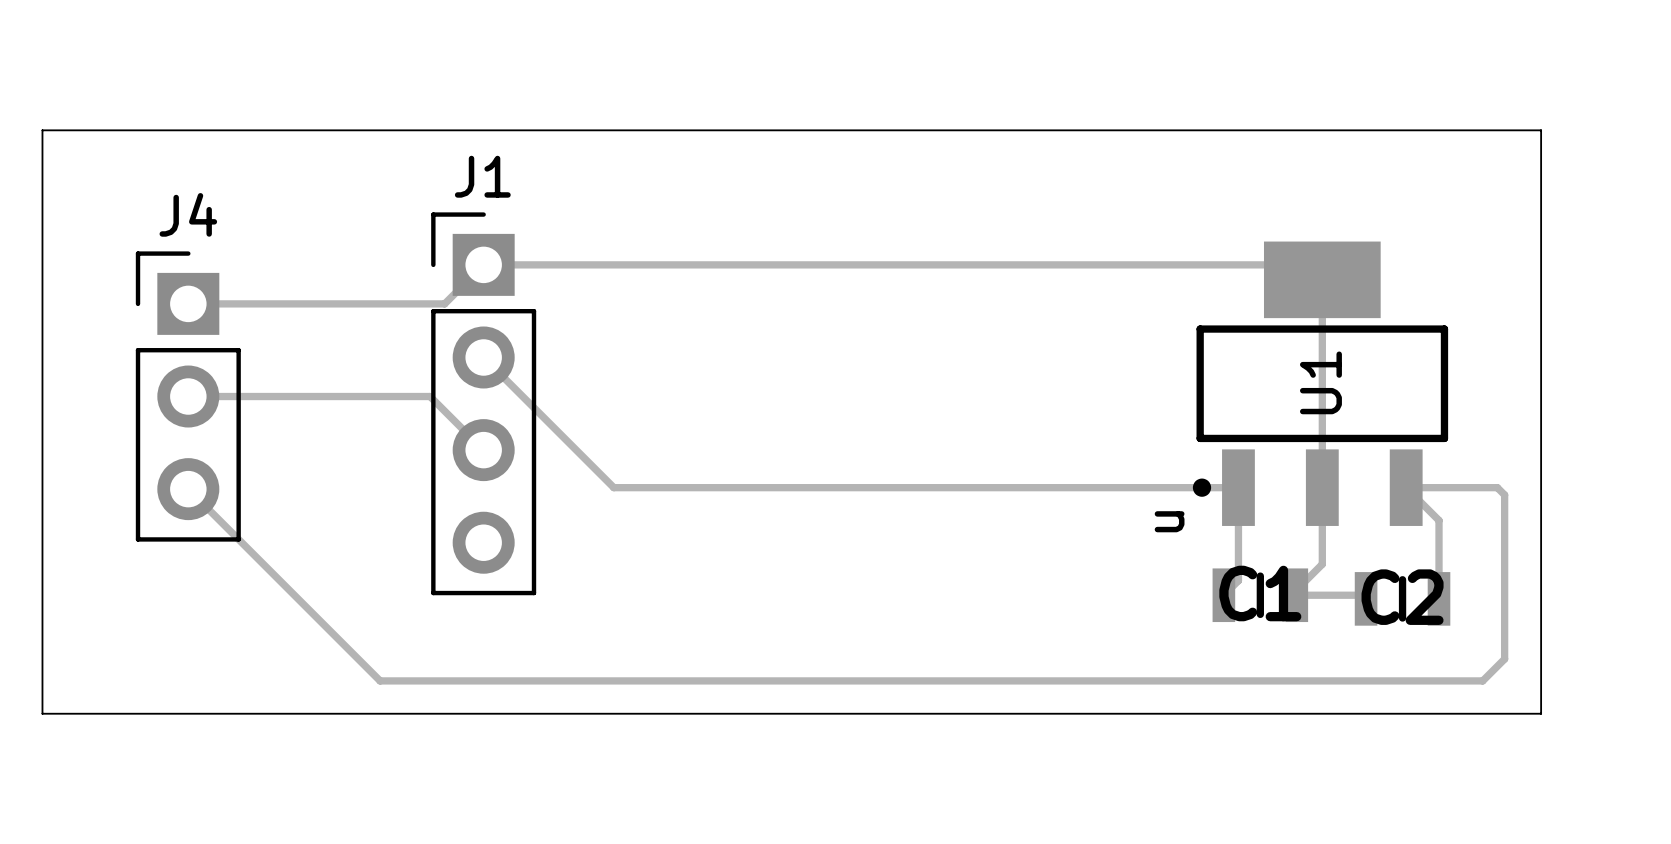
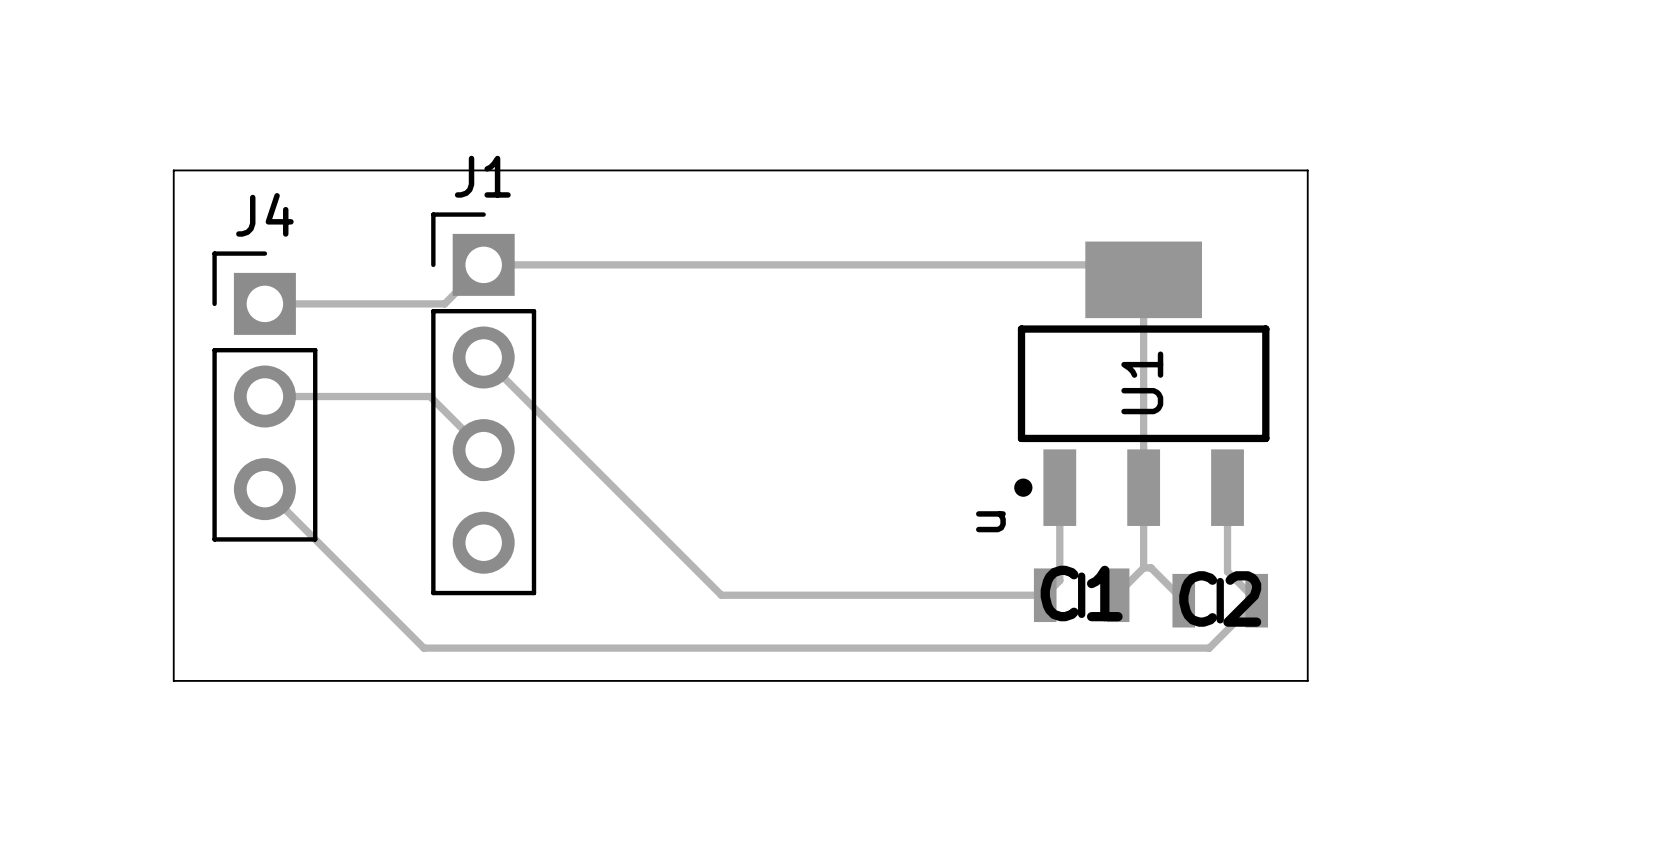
board edge: (42, 130) (1541, 130) (1541, 713) (42, 713) (42, 130) -> (173, 170) (173, 680) (1307, 680) (1307, 170) (173, 170)
track: (1128, 264) (1307, 264) (1322, 279) (1322, 564) (1296, 589) (1296, 595) (1362, 595) (1366, 598) -> (1128, 264) (1143, 279) (1143, 567)
track: (188, 303) (264, 303) -> none
U1 position: (1320, 383) -> (1141, 383)
track: (188, 396) (264, 396) -> none
J4 position: (188, 396) -> (264, 396)
track: (613, 487) (1238, 487) (1238, 580) (1223, 595) -> (613, 487) (721, 595) (1045, 595) (1059, 580) (1059, 487)
track: none -> (1227, 487) (1227, 571) (1256, 600) (1209, 648) (423, 648) (264, 489)
track: (188, 489) (380, 680) (1482, 680) (1504, 659) (1504, 494) (1497, 487) (1406, 487) (1439, 520) (1439, 598) -> none
track: none -> (1143, 567) (1118, 593)
track: none -> (1143, 567) (1150, 567) (1183, 600)
C1 position: (1260, 595) -> (1081, 595)
C2 position: (1402, 598) -> (1220, 600)

